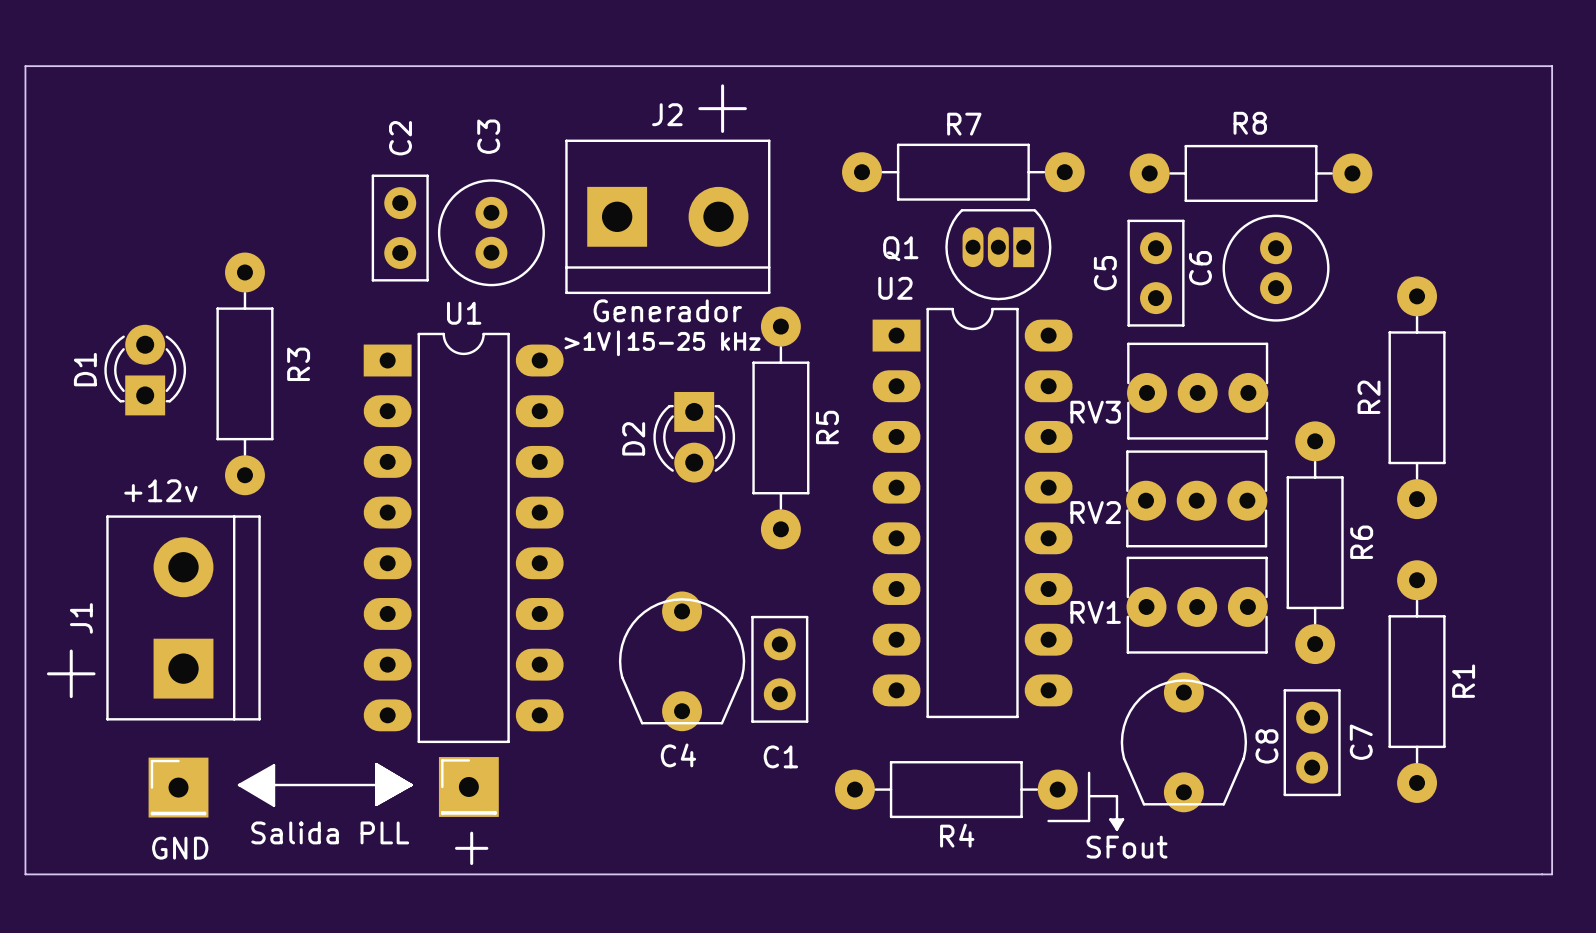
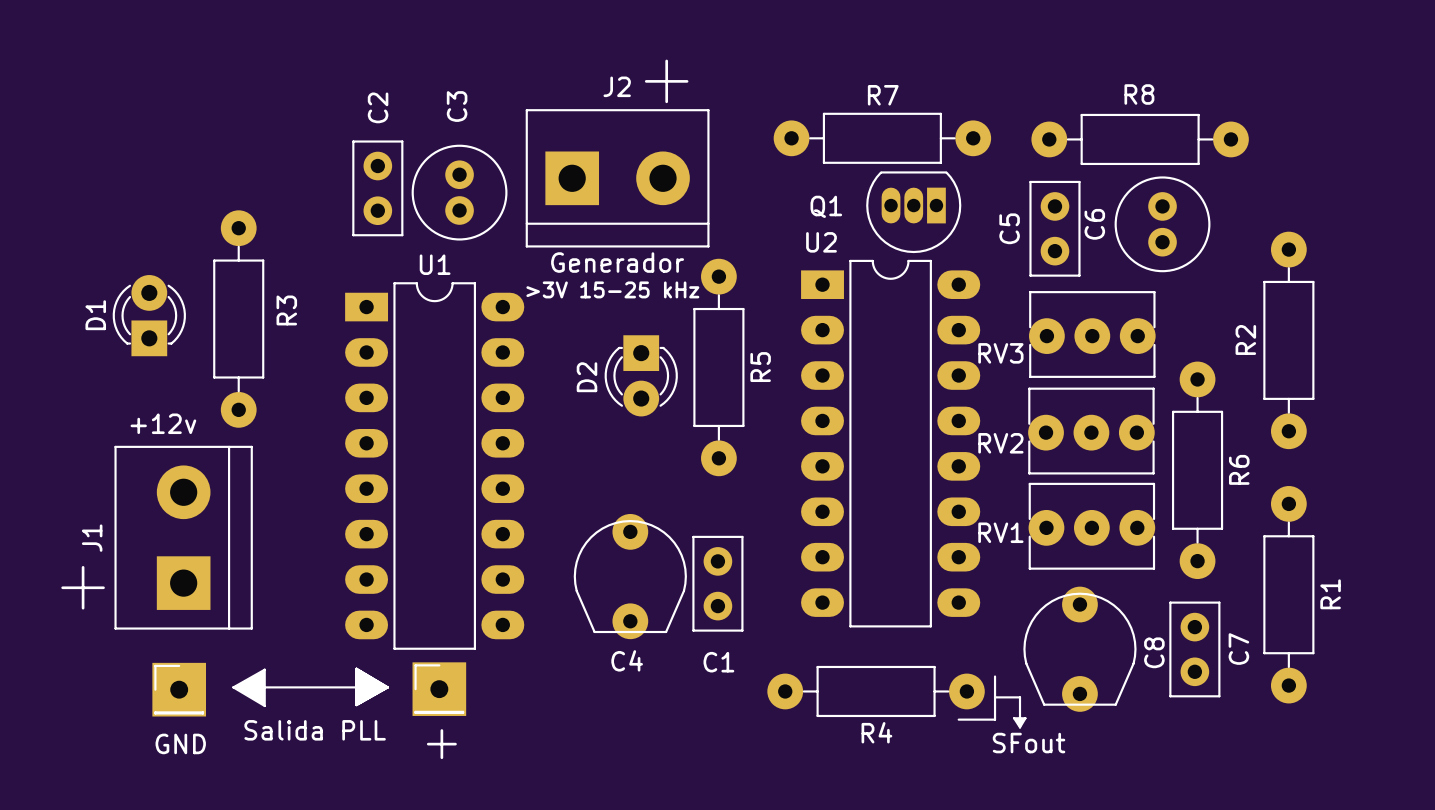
board edge: (25, 66) (25, 874) (1552, 874) (1552, 66) (25, 66) -> none
text: >1V|15-25 kHz (662, 343) -> >3V 15-25 kHz (612, 289)

